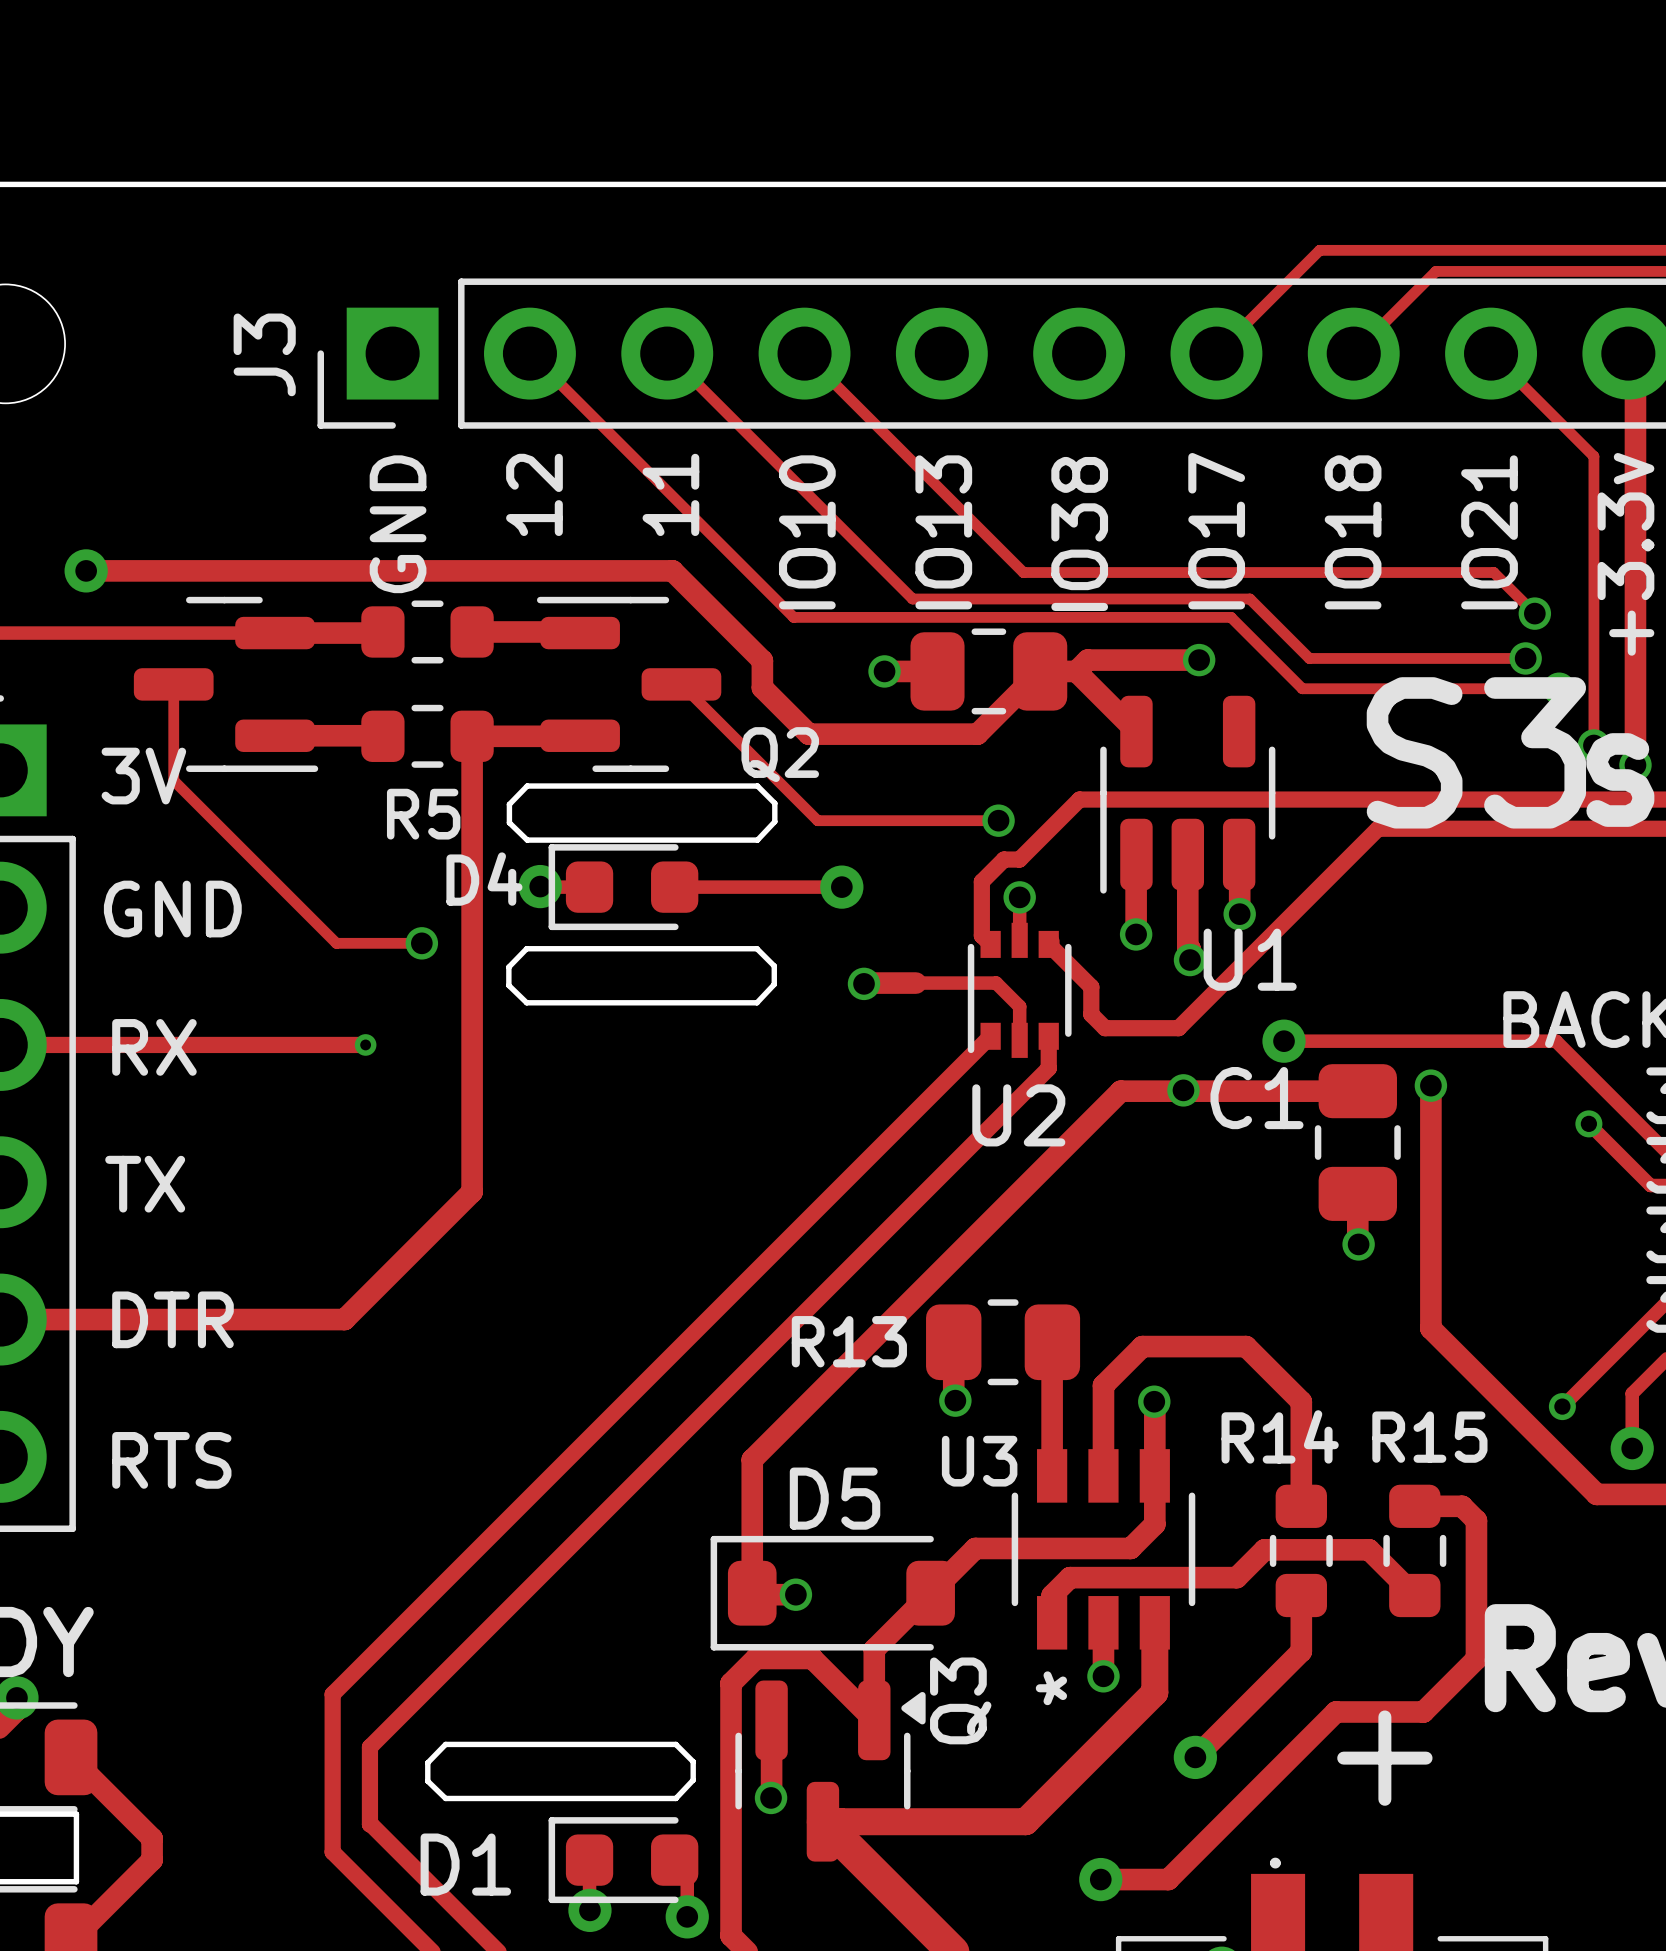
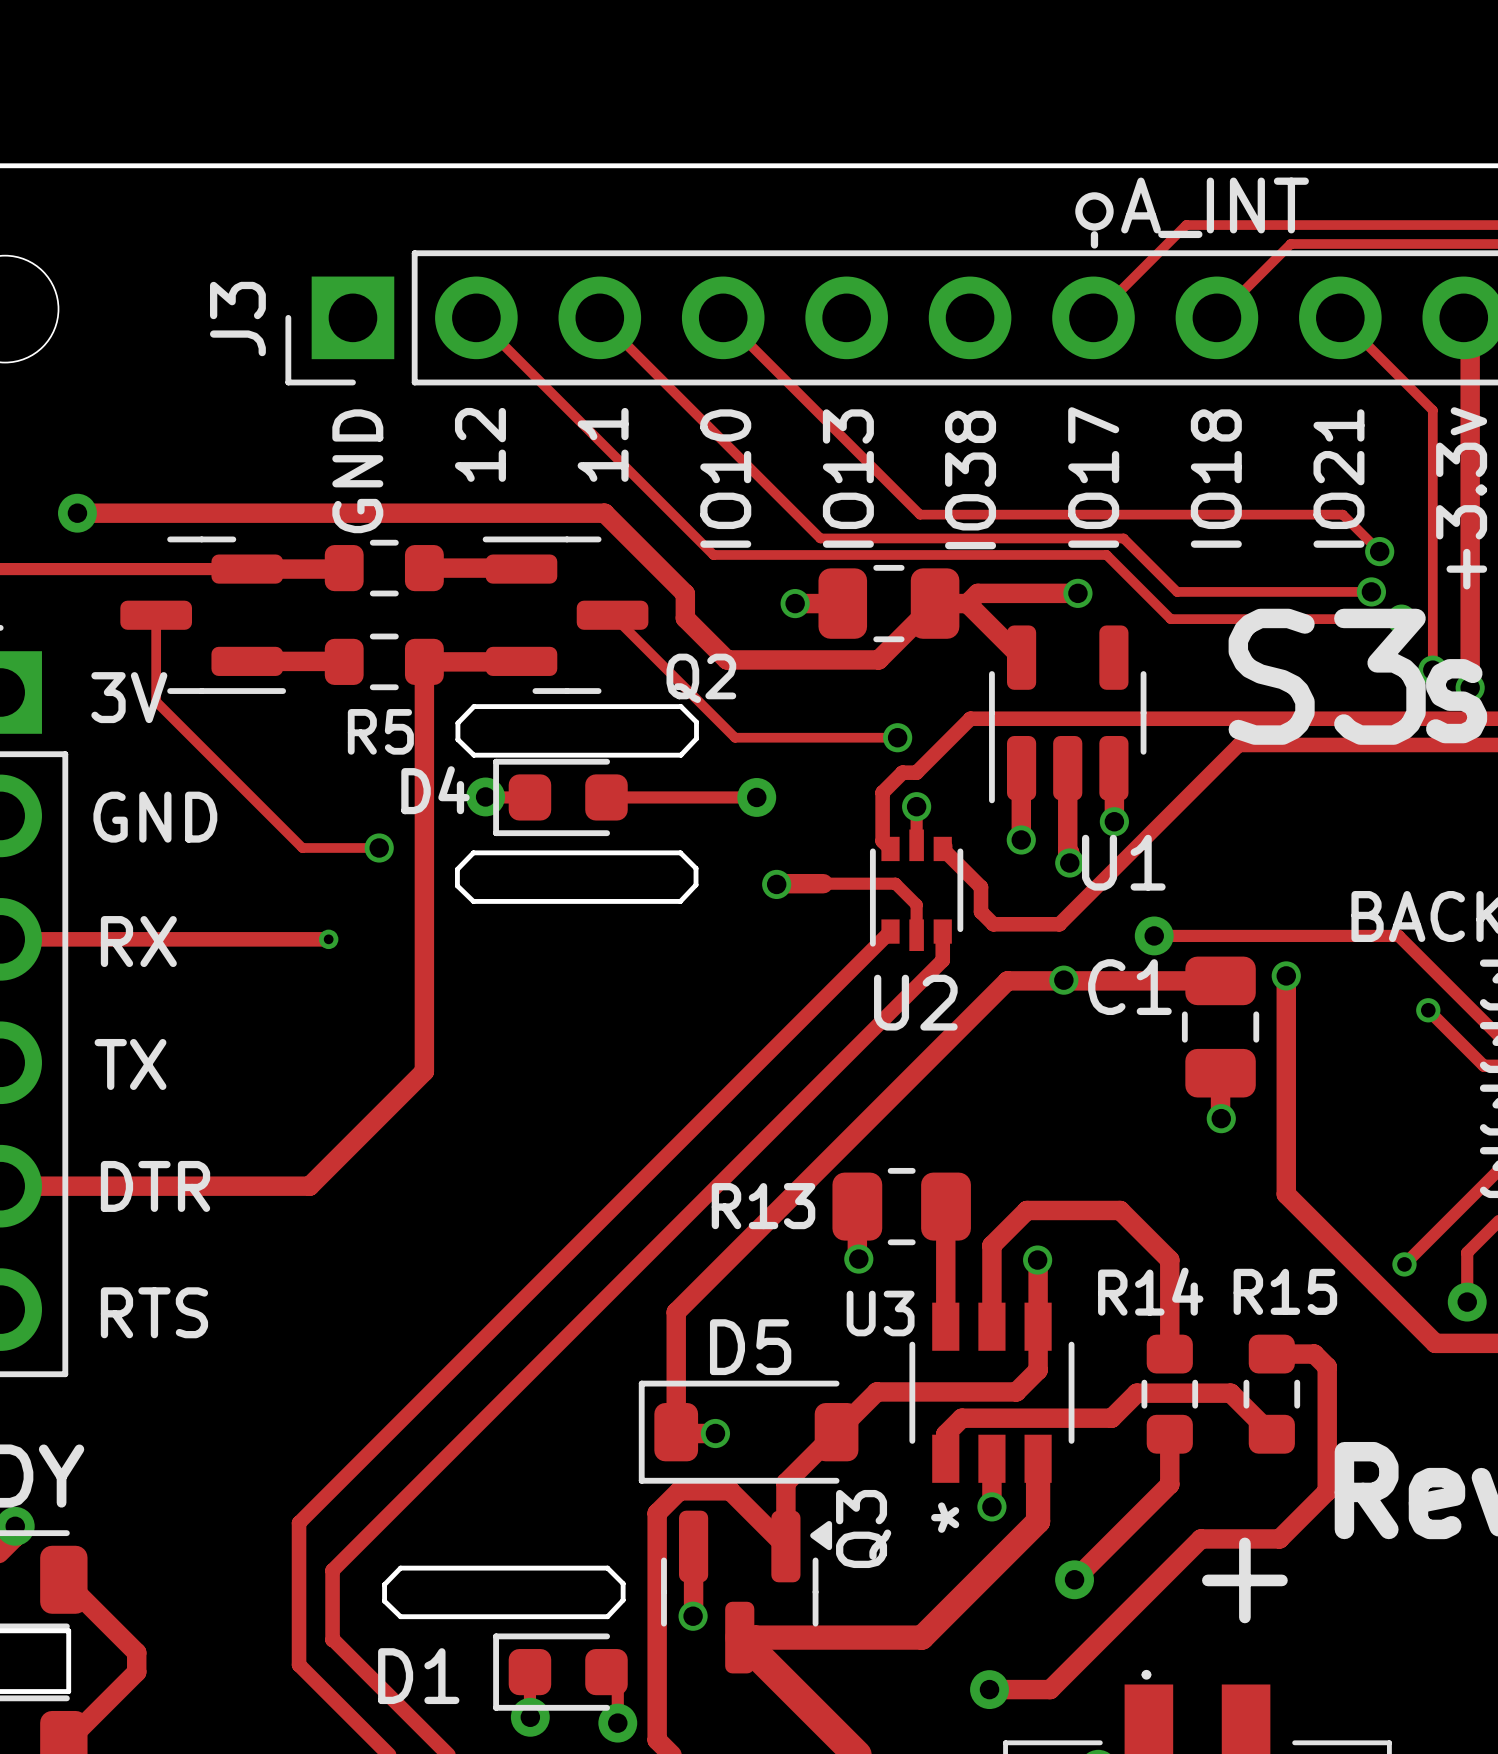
drawing: none -> [1075, 192, 1114, 231]
text: none -> A_INT (1215, 207)
line: none -> (1094, 234) (1094, 244)

